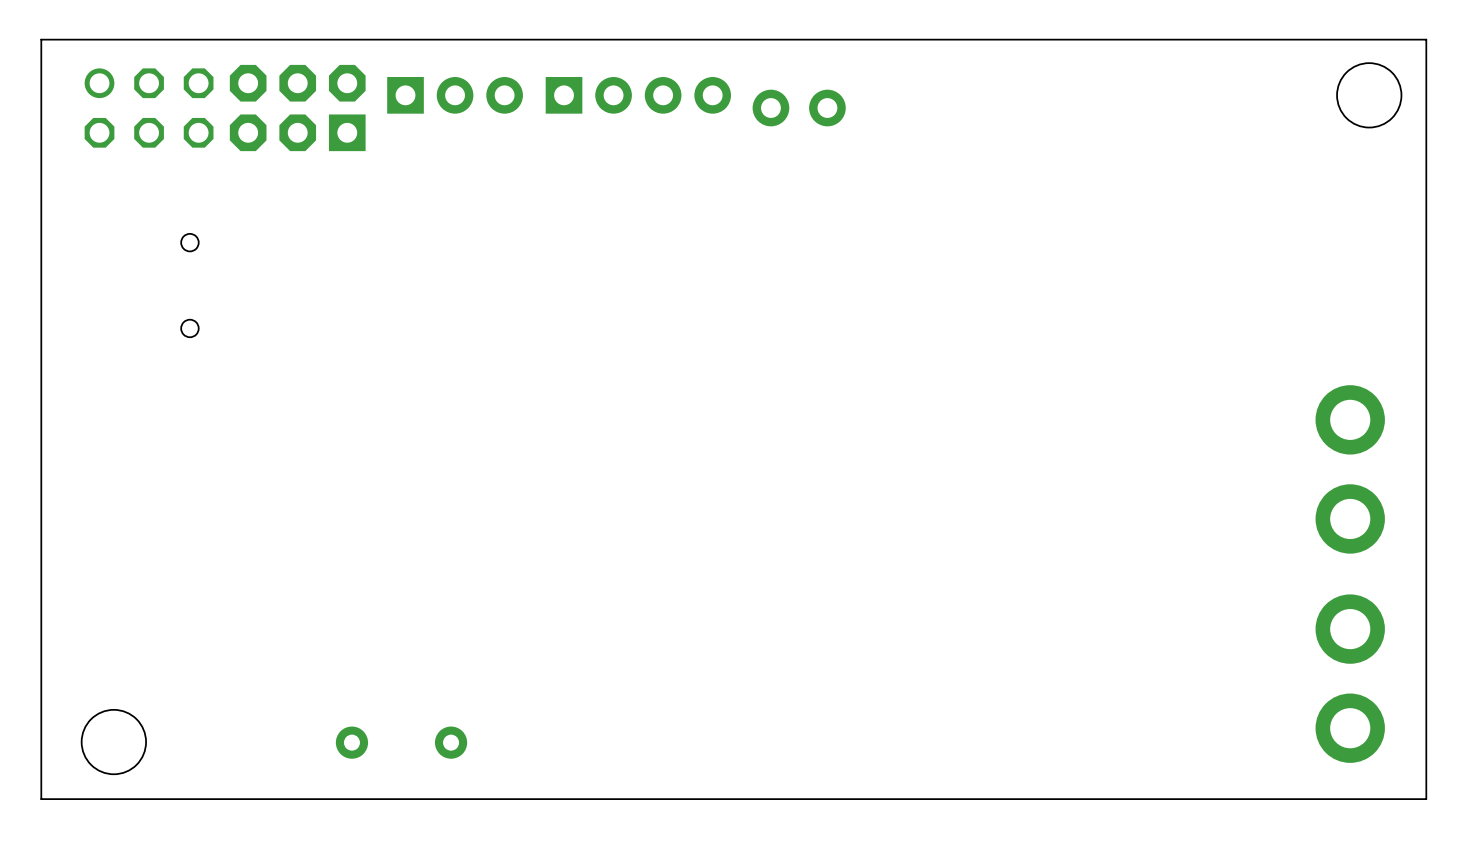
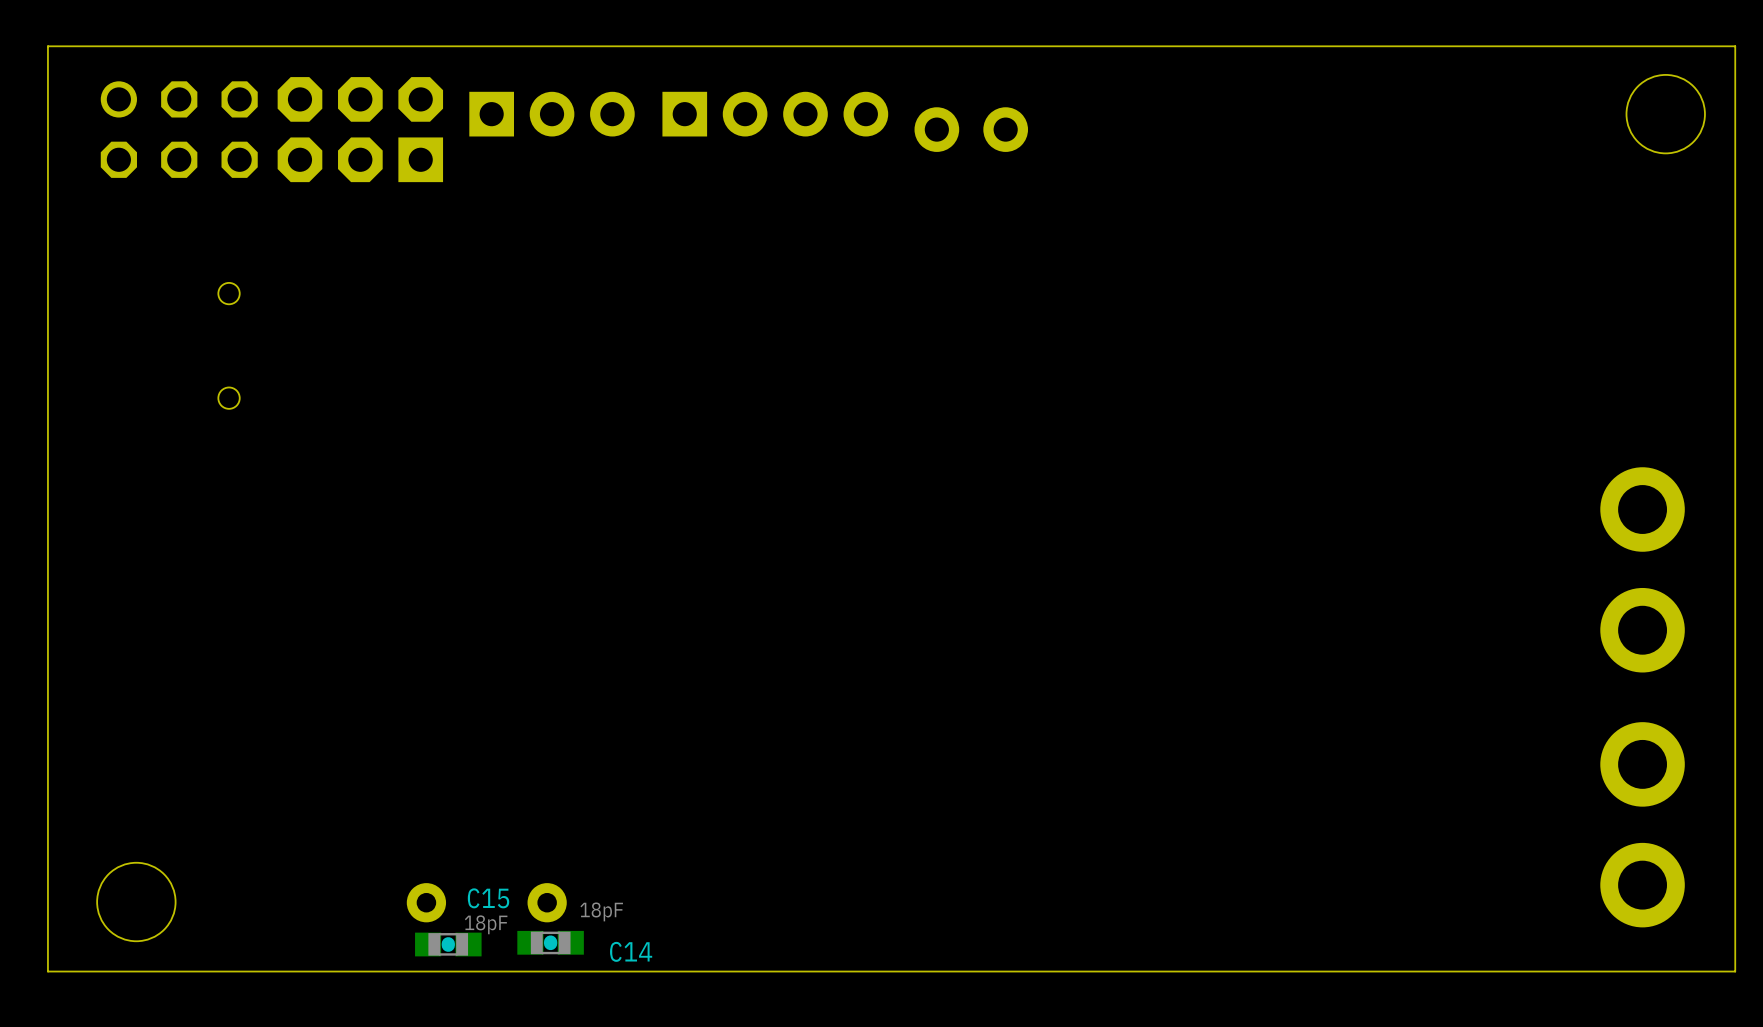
C14: none -> 18pF (550, 942)
C15: none -> 18pF (448, 944)

